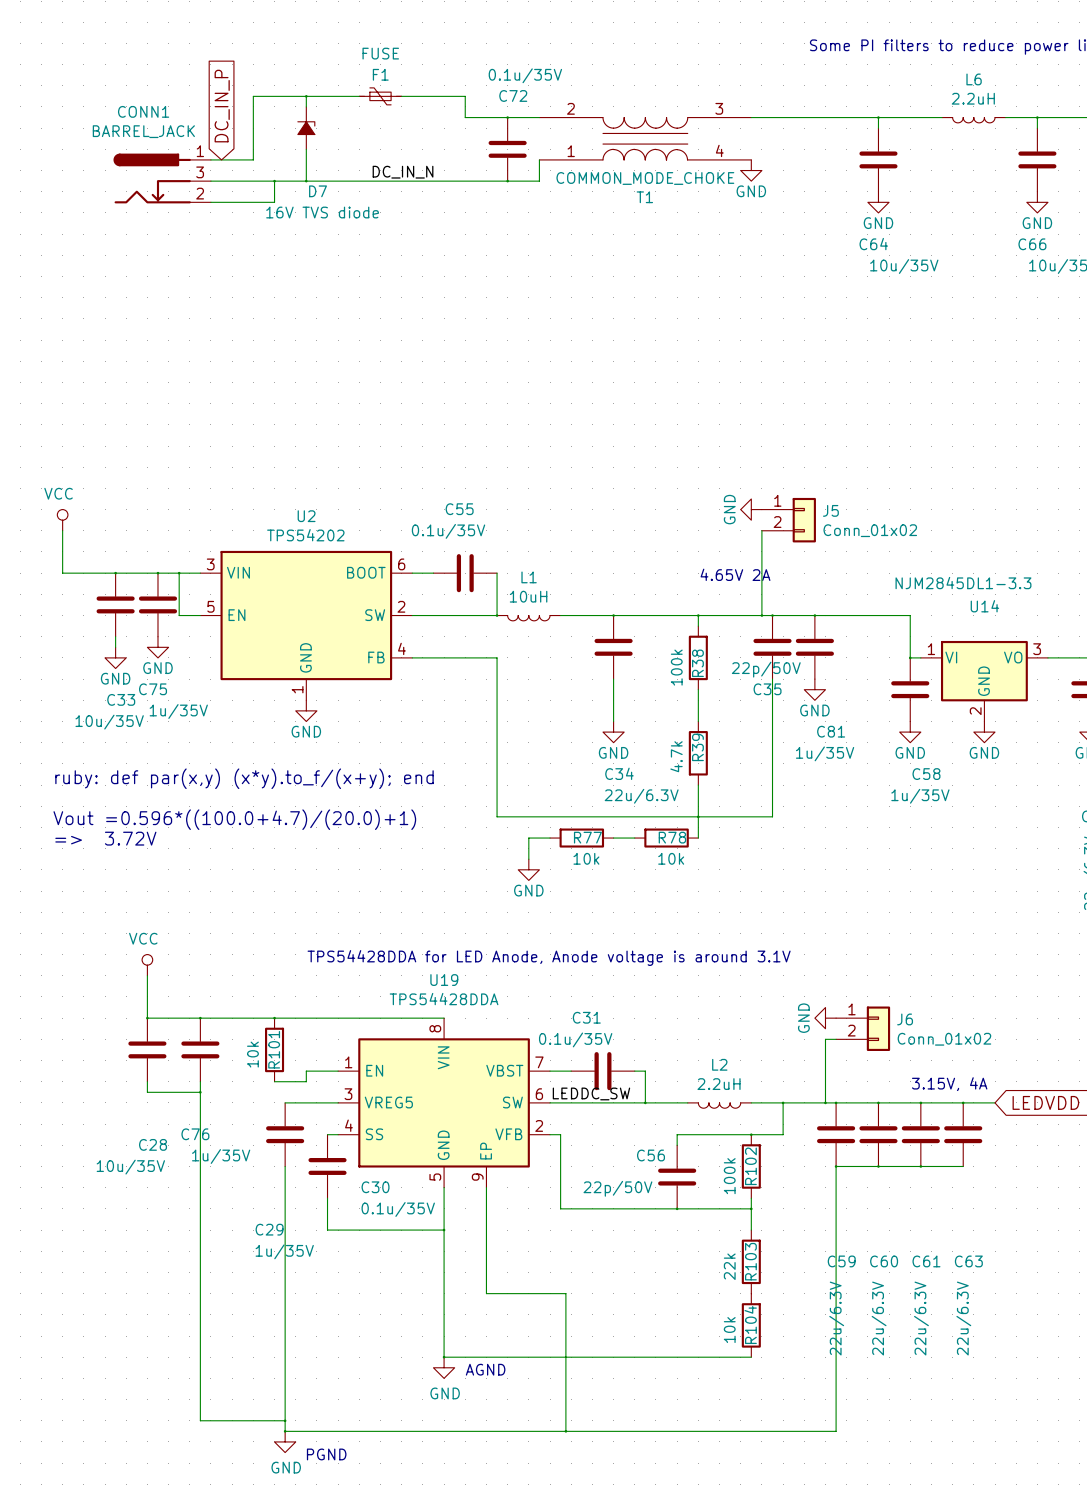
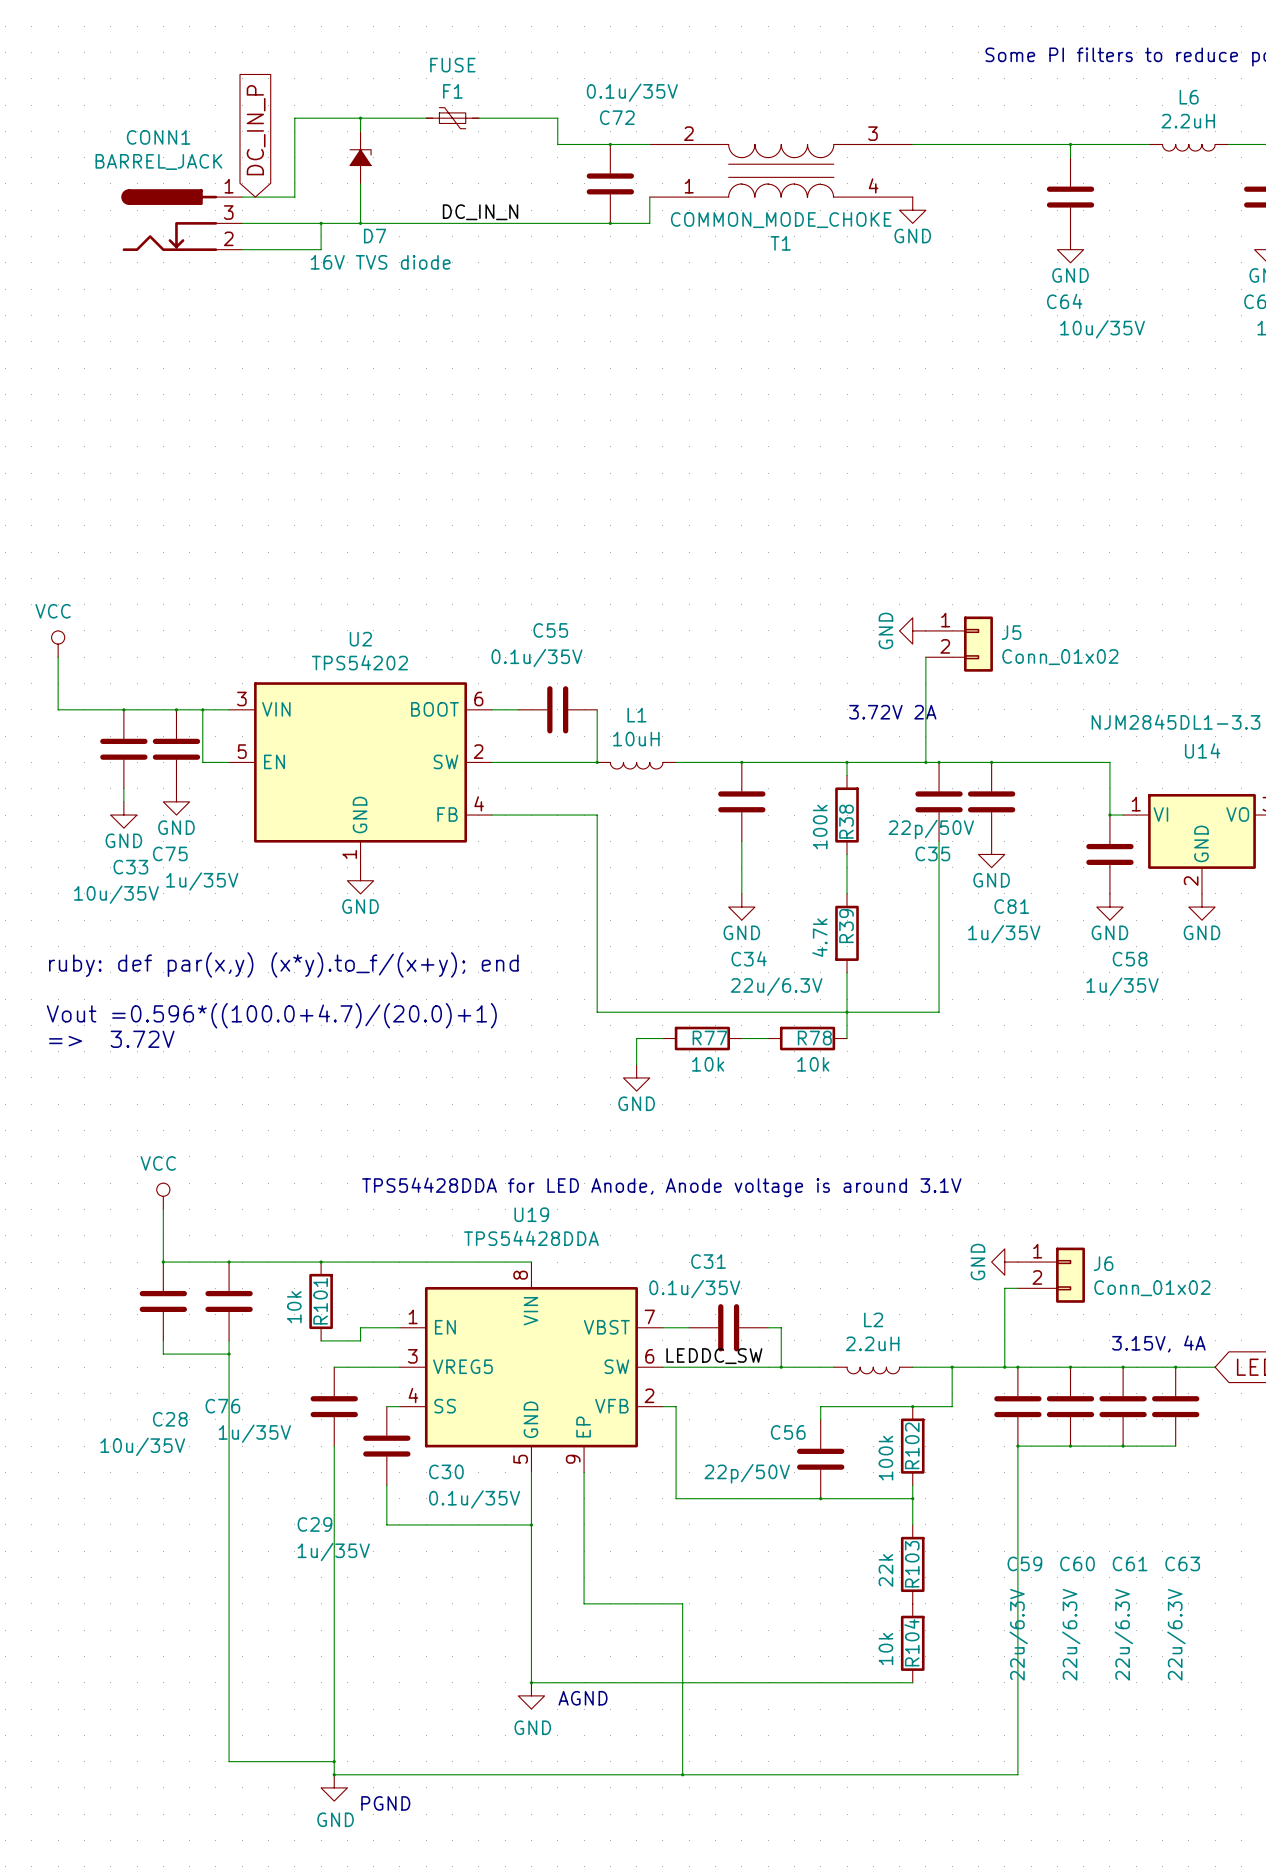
text: 4.65V 2A (735, 574) -> 3.72V 2A (892, 712)

